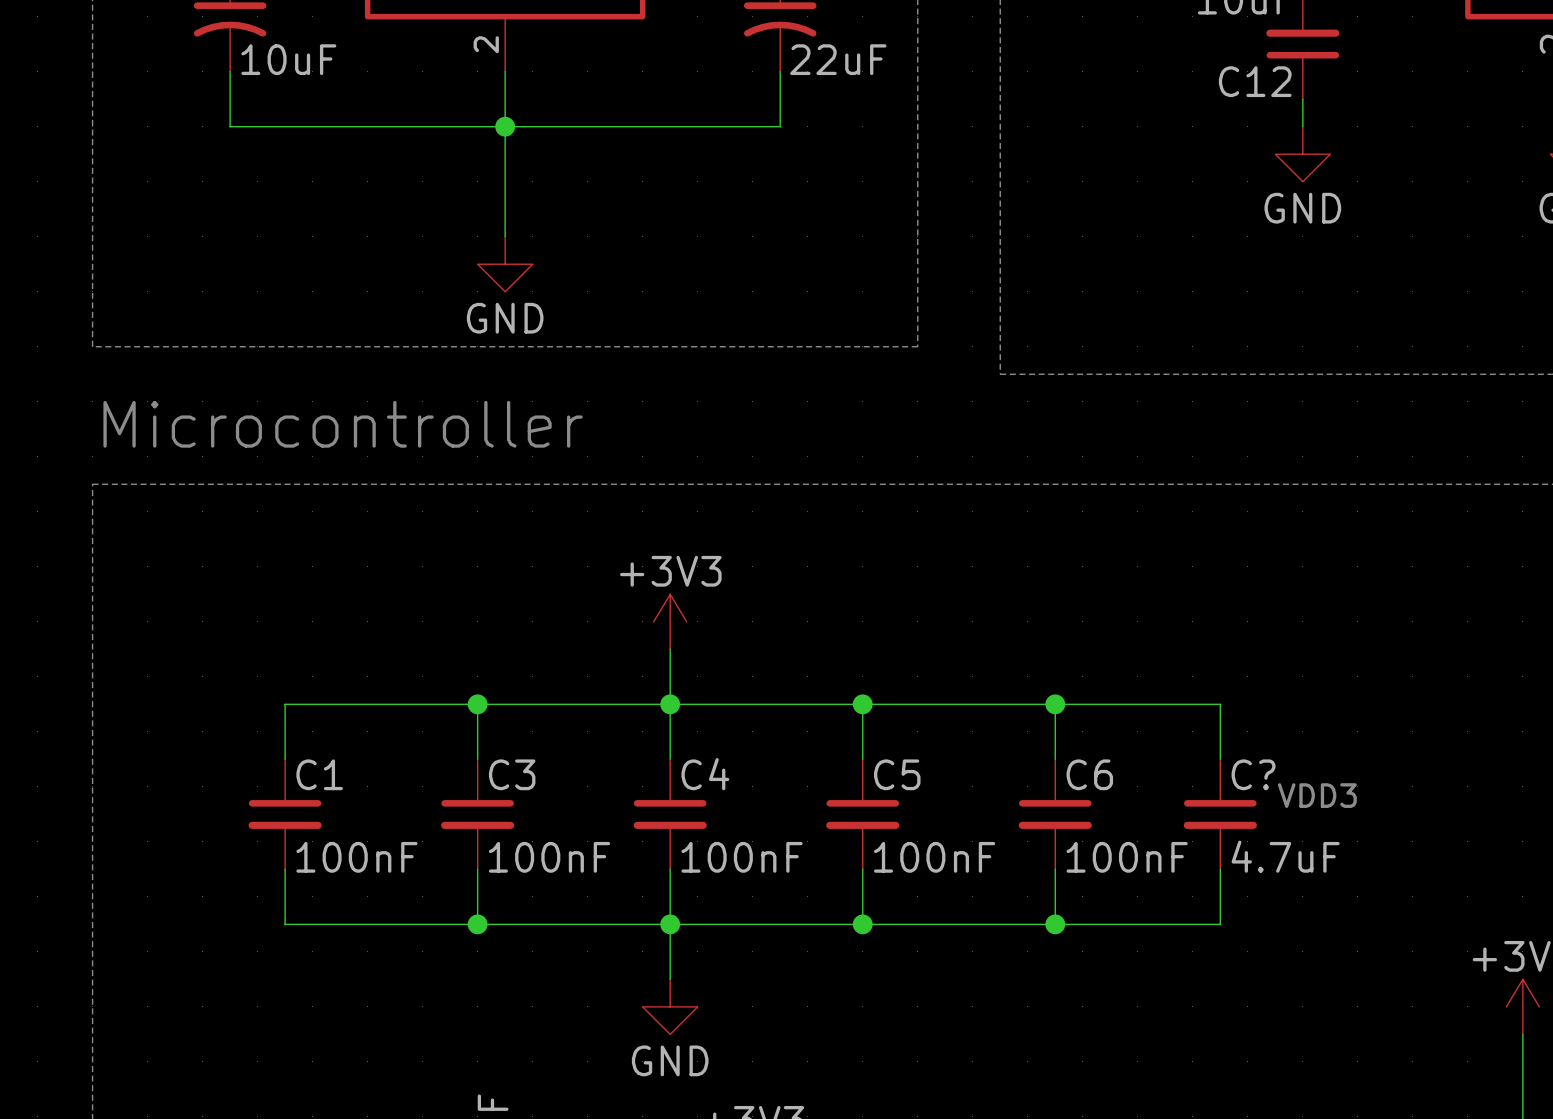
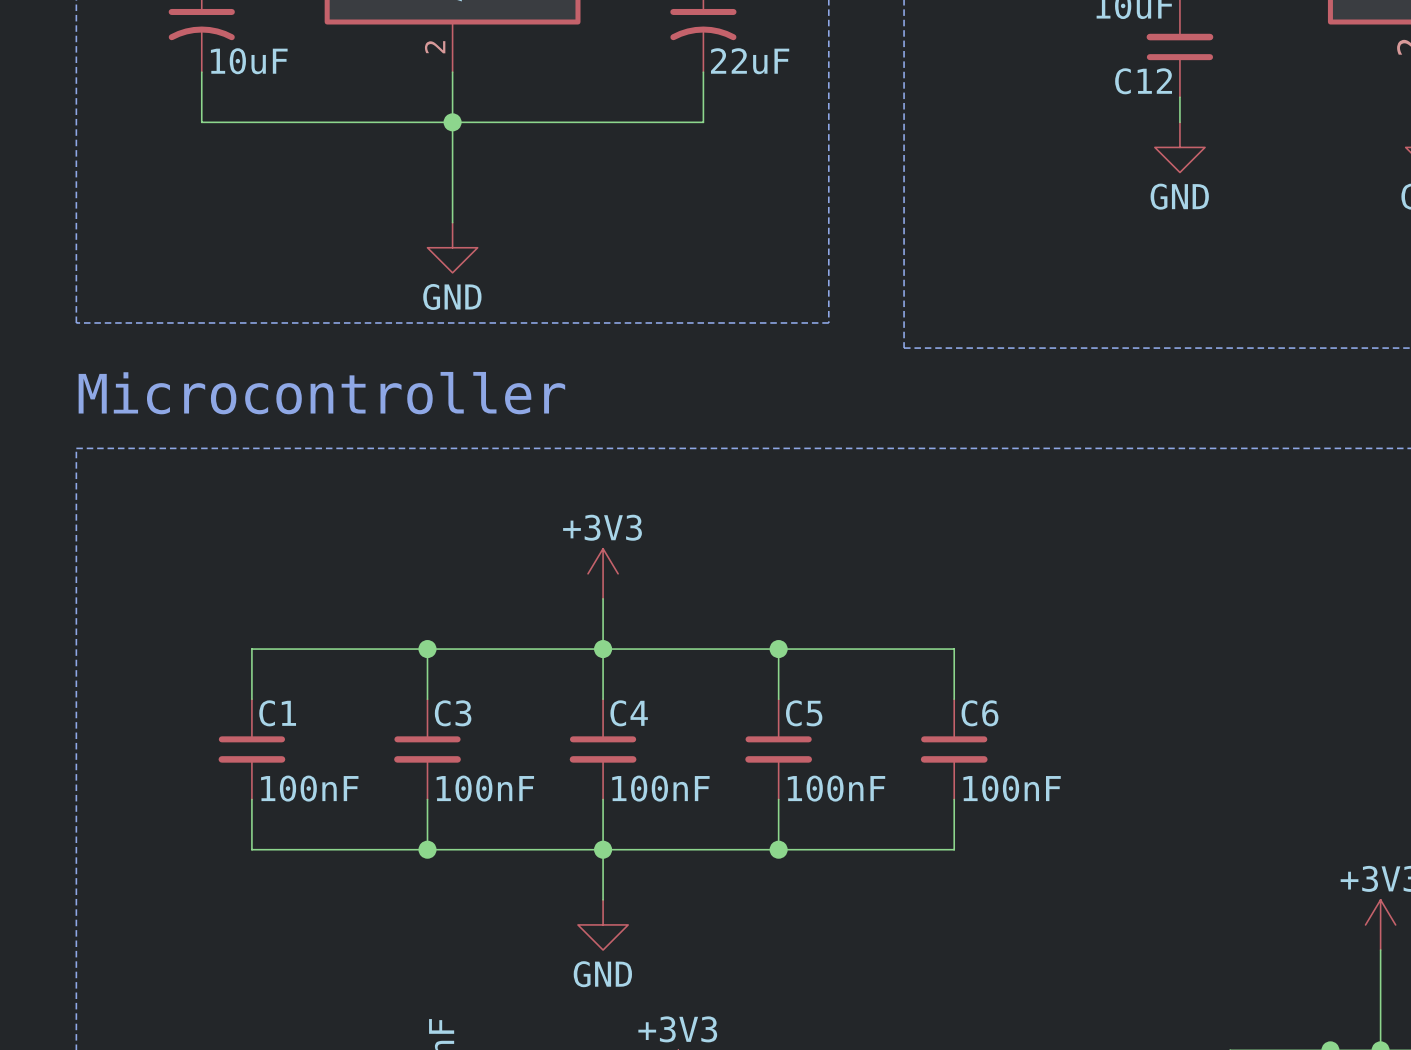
wire: (1055, 704) (1220, 704) (1220, 759) -> none
junction: (1055, 704) -> none
text: VDD3 (1317, 795) -> none
C?: 4.7uF (1220, 814) -> none
wire: (1220, 869) (1220, 924) (1055, 924) -> none
junction: (1055, 924) -> none

